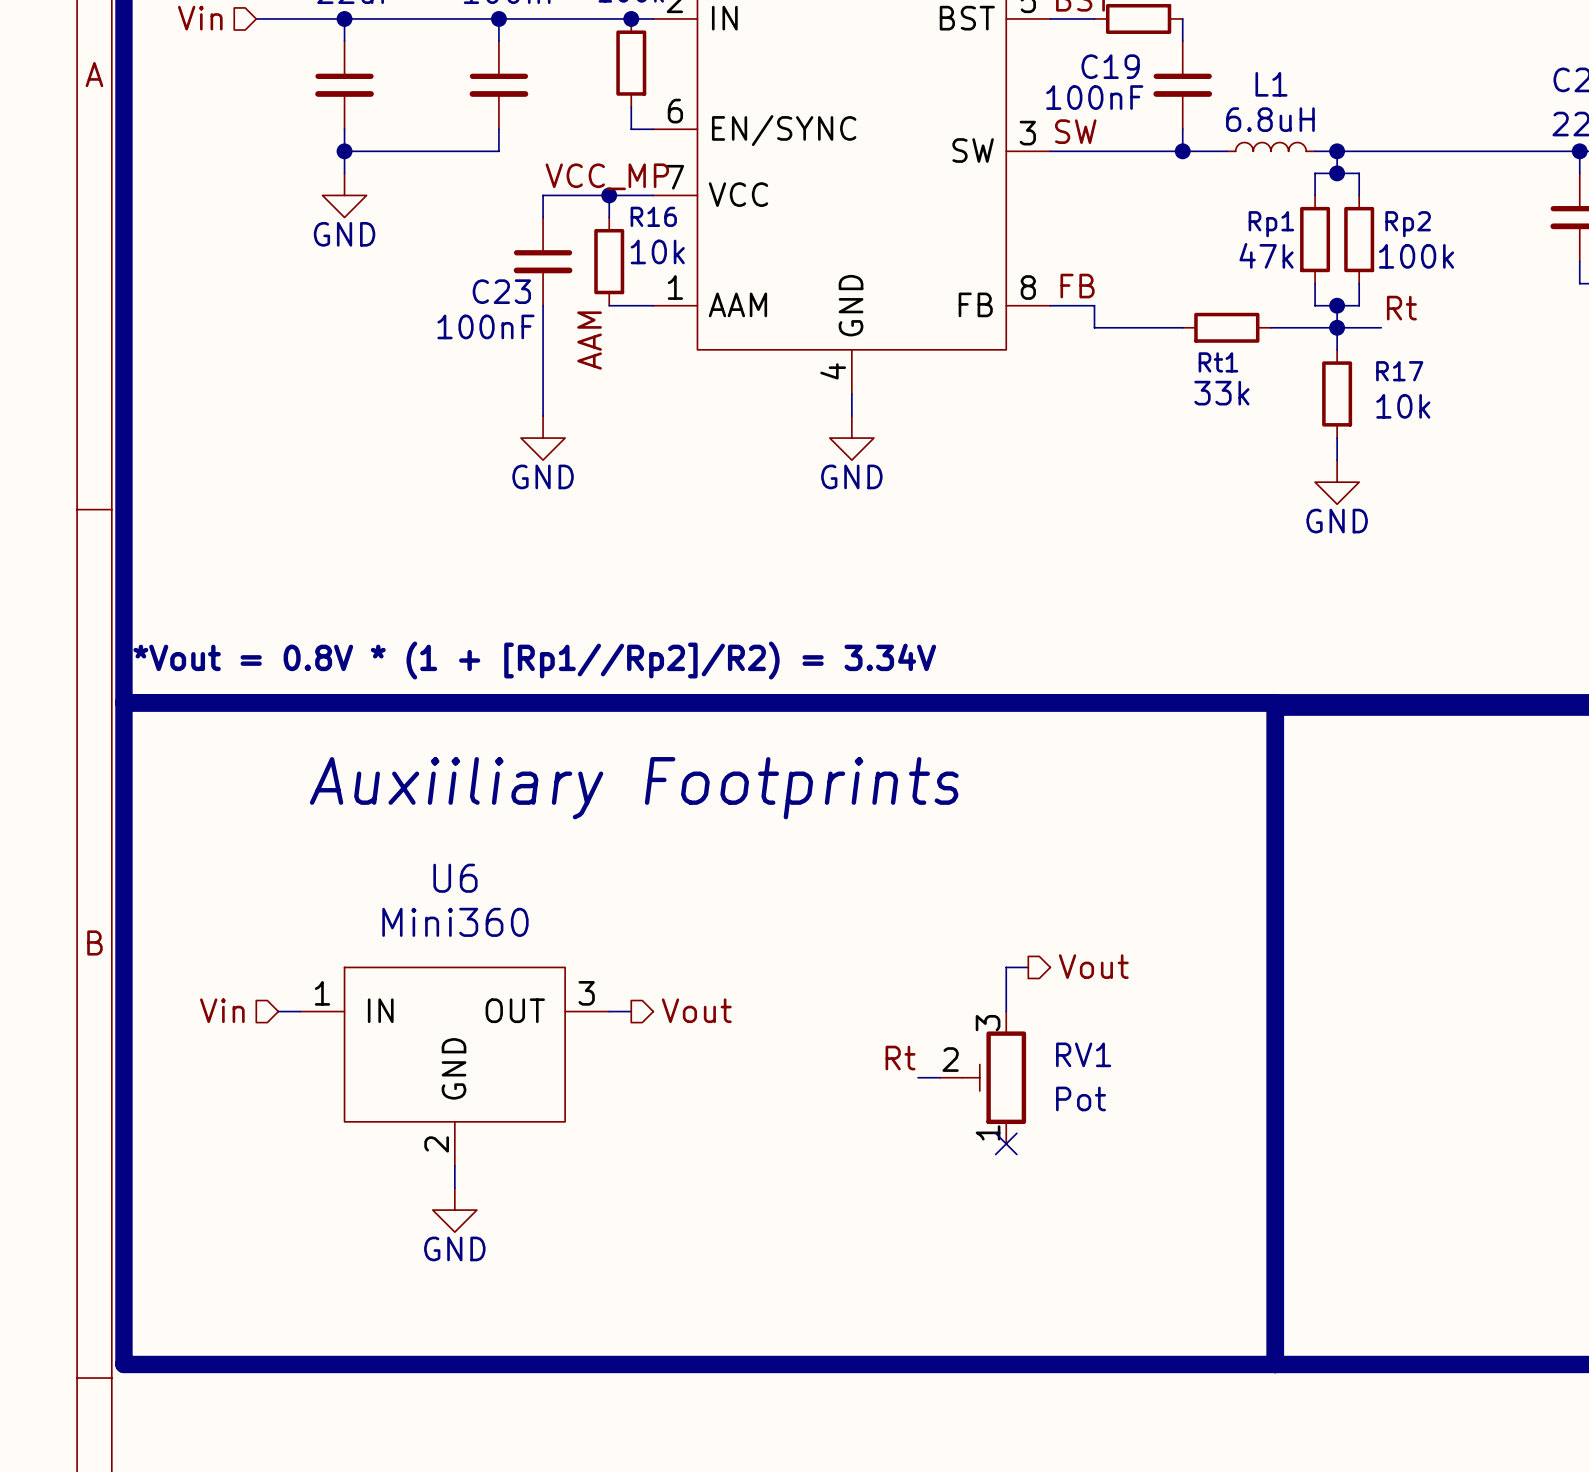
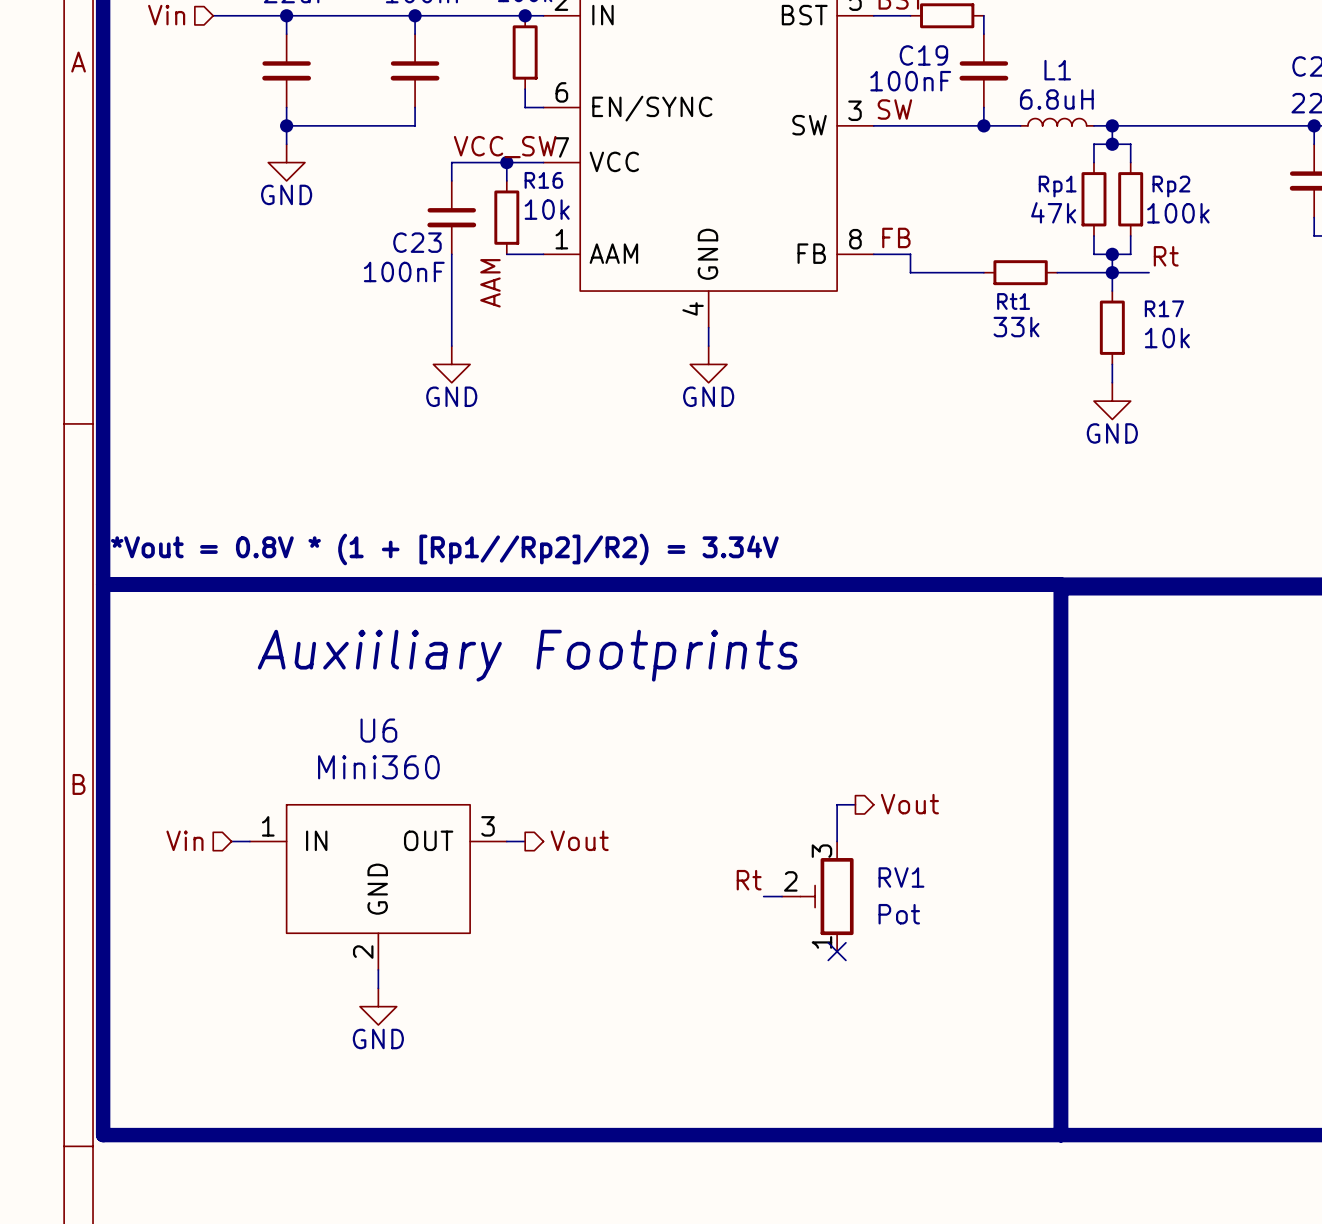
label: VCC_MP (607, 176) -> VCC_SW (505, 147)

